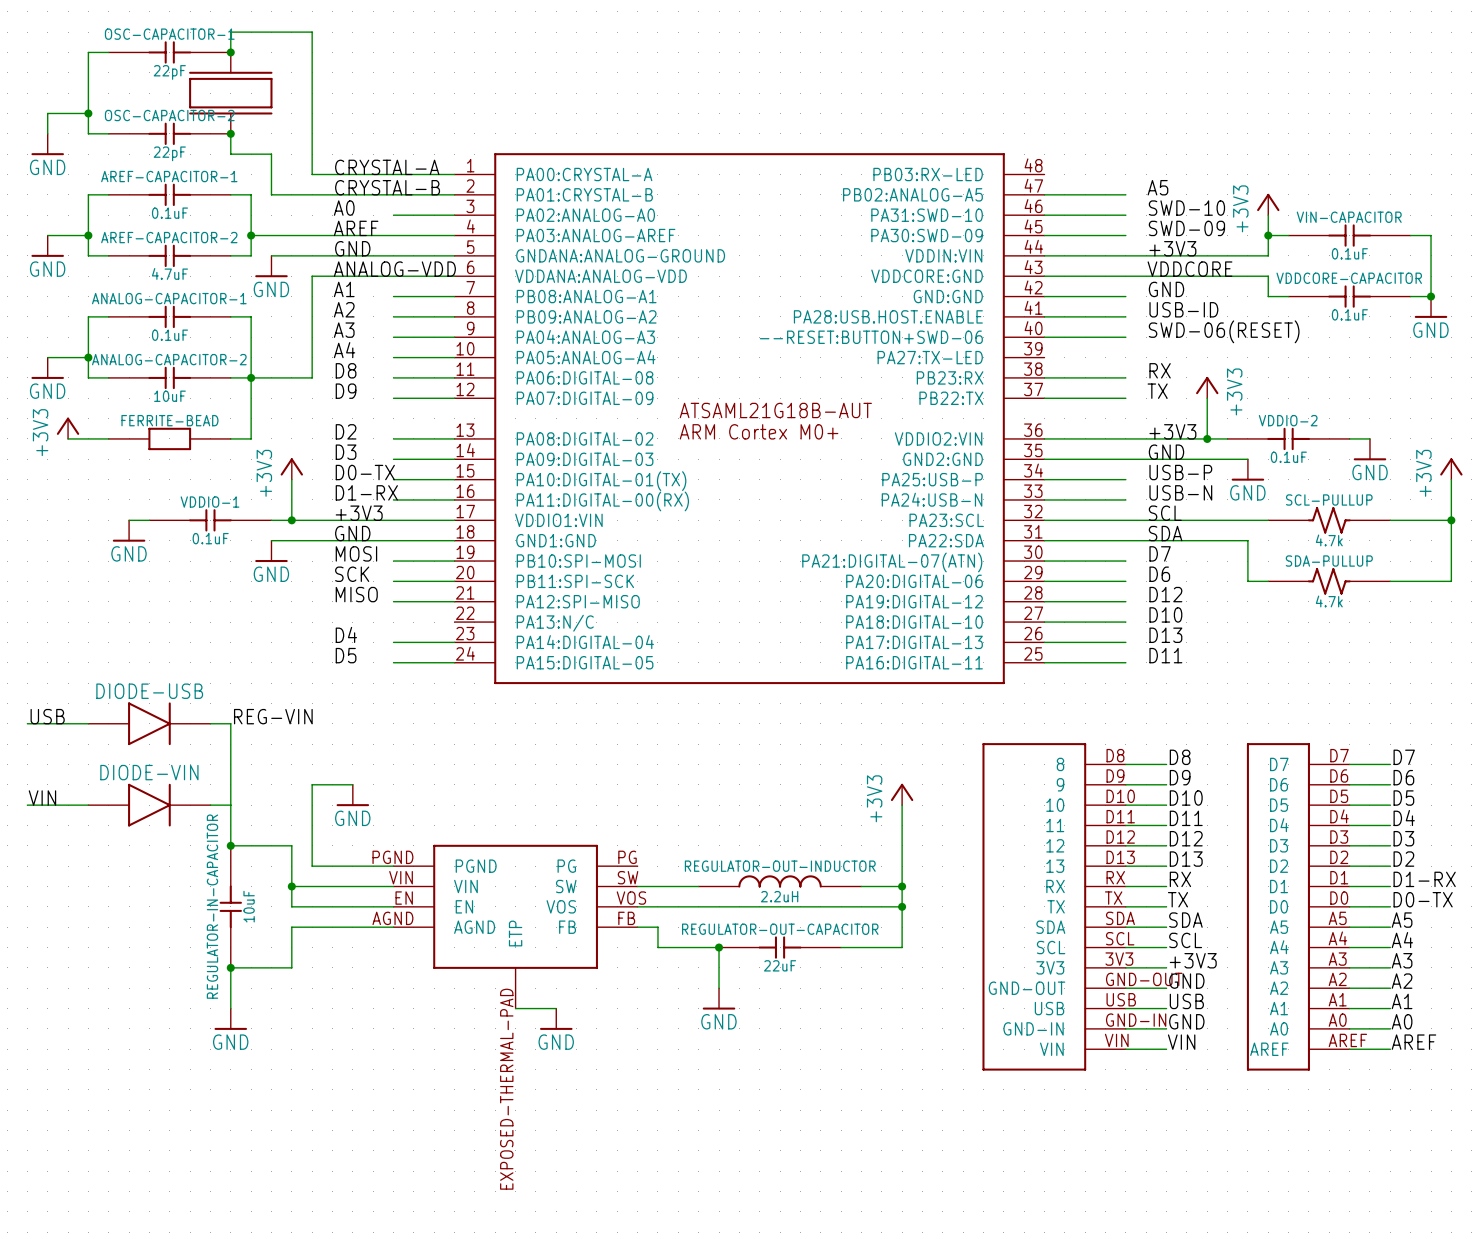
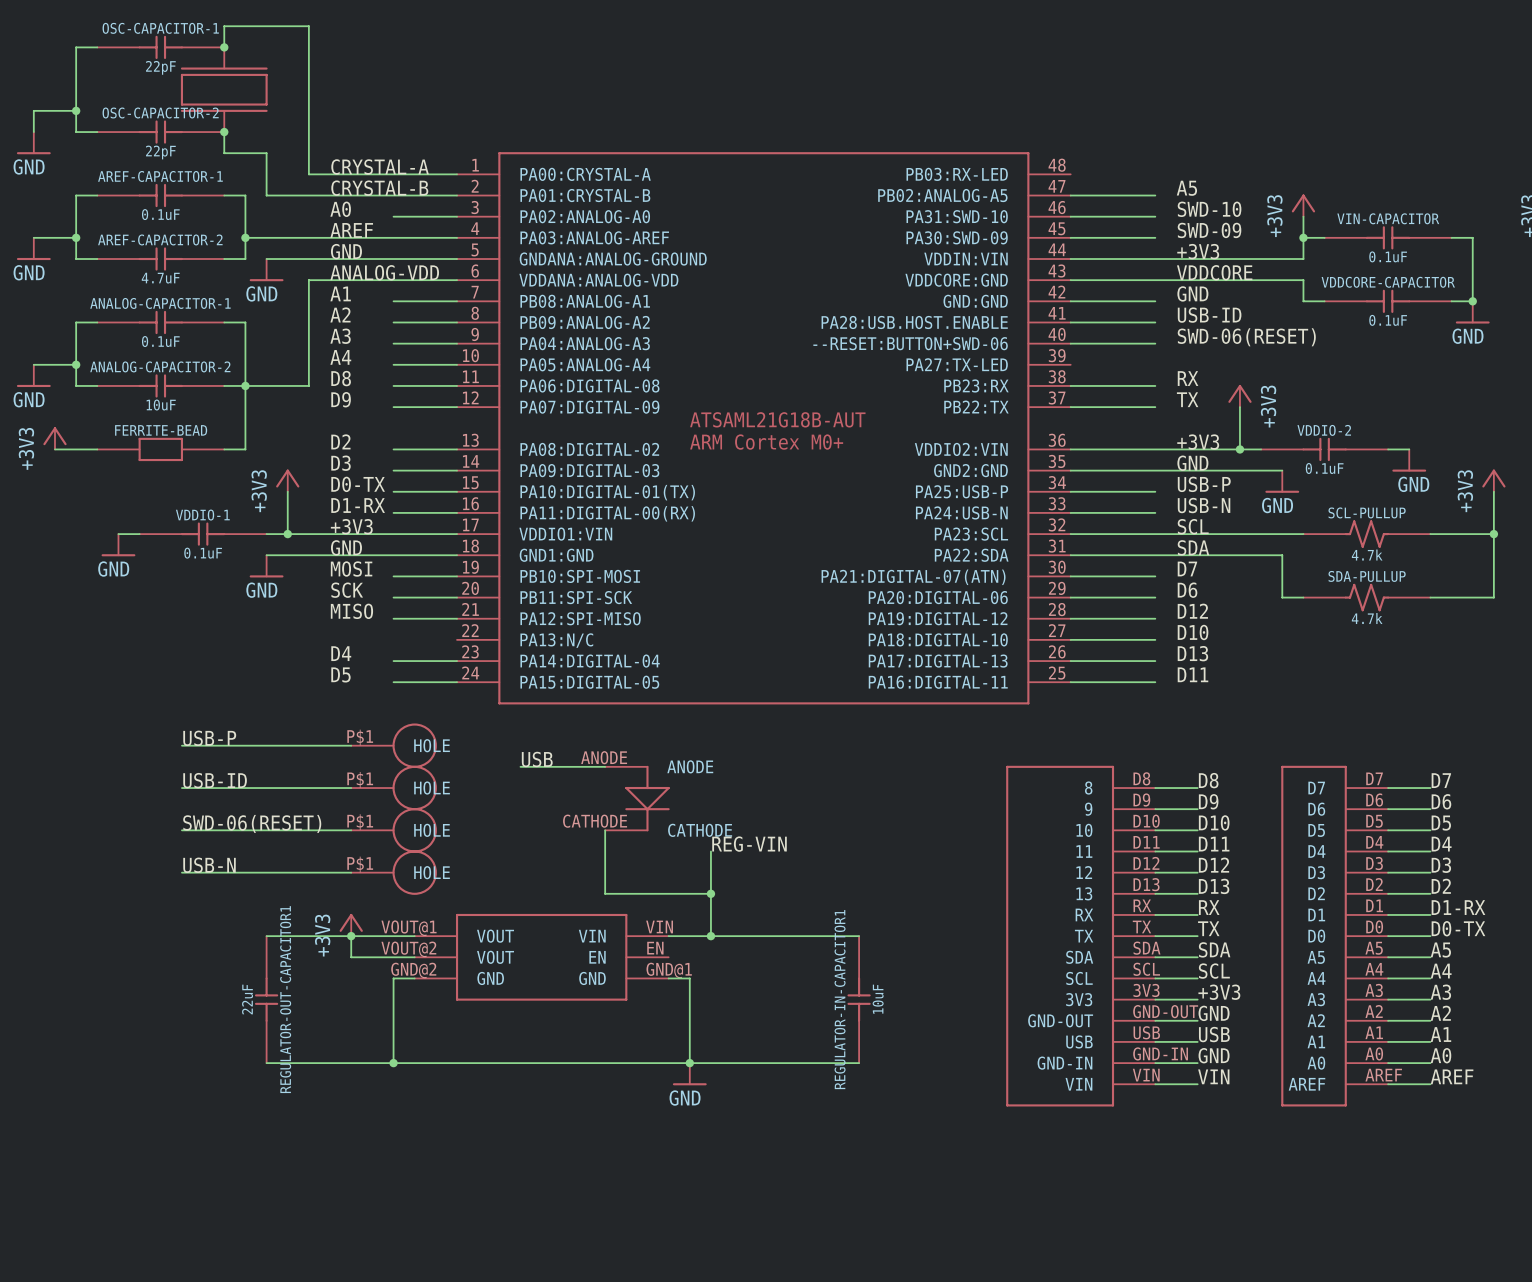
label: USB (47, 716) -> none
label: none -> USB-P (209, 738)
label: REG-VIN (273, 716) -> none
wire: (27, 723) (88, 723) -> none
DIODE-USB: (149, 723) -> none
wire: (230, 723) (230, 845) -> (181, 872) (224, 872)
wire: none -> (224, 745) (351, 745)
part: none -> (394, 745)
label: none -> USB (537, 759)
wire: none -> (520, 766) (605, 766)
label: none -> USB-ID (215, 780)
wire: none -> (181, 788) (351, 788)
part: none -> (394, 788)
part: none -> (637, 798)
wire: (352, 784) (312, 784) (312, 866) (393, 866) -> none
power symbol: +3V3 (902, 794) -> none
power symbol: GND (352, 795) -> none
label: VIN (42, 798) -> none
label: none -> SWD-06(RESET) (252, 823)
wire: (27, 805) (88, 805) -> none
DIODE-VIN: (149, 805) -> none
wire: none -> (224, 830) (351, 830)
part: none -> (394, 830)
wire: none -> (605, 830) (605, 893) (710, 893)
wire: (902, 805) (902, 947) (841, 947) -> none
label: none -> REG-VIN (749, 844)
wire: none -> (710, 851) (710, 936)
label: none -> USB-N (209, 865)
junction: (230, 845) -> none
wire: (291, 845) (291, 906) -> (266, 936) (287, 936)
wire: none -> (287, 872) (351, 872)
part: none -> (394, 872)
junction: none -> (710, 893)
REGULATOR-OUT-INDUCTOR: 2.2uH (780, 881) -> none
wire: (291, 886) (393, 886) -> none
junction: (291, 886) -> none
wire: (637, 886) (698, 886) -> none
wire: (861, 886) (902, 886) -> none
junction: (902, 886) -> none
power symbol: none -> +3V3 (351, 925)
REGULATOR-IN-CAPACITOR: 10uF (230, 906) -> none
junction: none -> (351, 936)
junction: none -> (710, 936)
wire: (841, 906) (902, 906) -> none
junction: (902, 906) -> none
part: (515, 926) -> none
wire: (352, 927) (291, 927) (291, 967) (230, 967) (230, 1008) -> (351, 957) (351, 936)
part: none -> (541, 957)
wire: none -> (414, 978) (393, 978) (393, 1063)
wire: (678, 947) (719, 947) (719, 988) -> (689, 978) (689, 1063)
junction: (719, 947) -> none
REGULATOR-OUT-CAPACITOR: 22uF (780, 947) -> none
junction: (230, 967) -> none
REGULATOR-OUT-CAPACITOR1: none -> 22uF (266, 999)
REGULATOR-IN-CAPACITOR1: none -> 10uF (859, 999)
power symbol position: GND (719, 998) -> GND (689, 1074)
wire: (515, 1008) (556, 1008) -> none
power symbol: GND (230, 1019) -> none
power symbol: GND (556, 1019) -> none
wire: none -> (266, 1063) (859, 1063)
junction: none -> (393, 1063)
junction: none -> (689, 1063)

